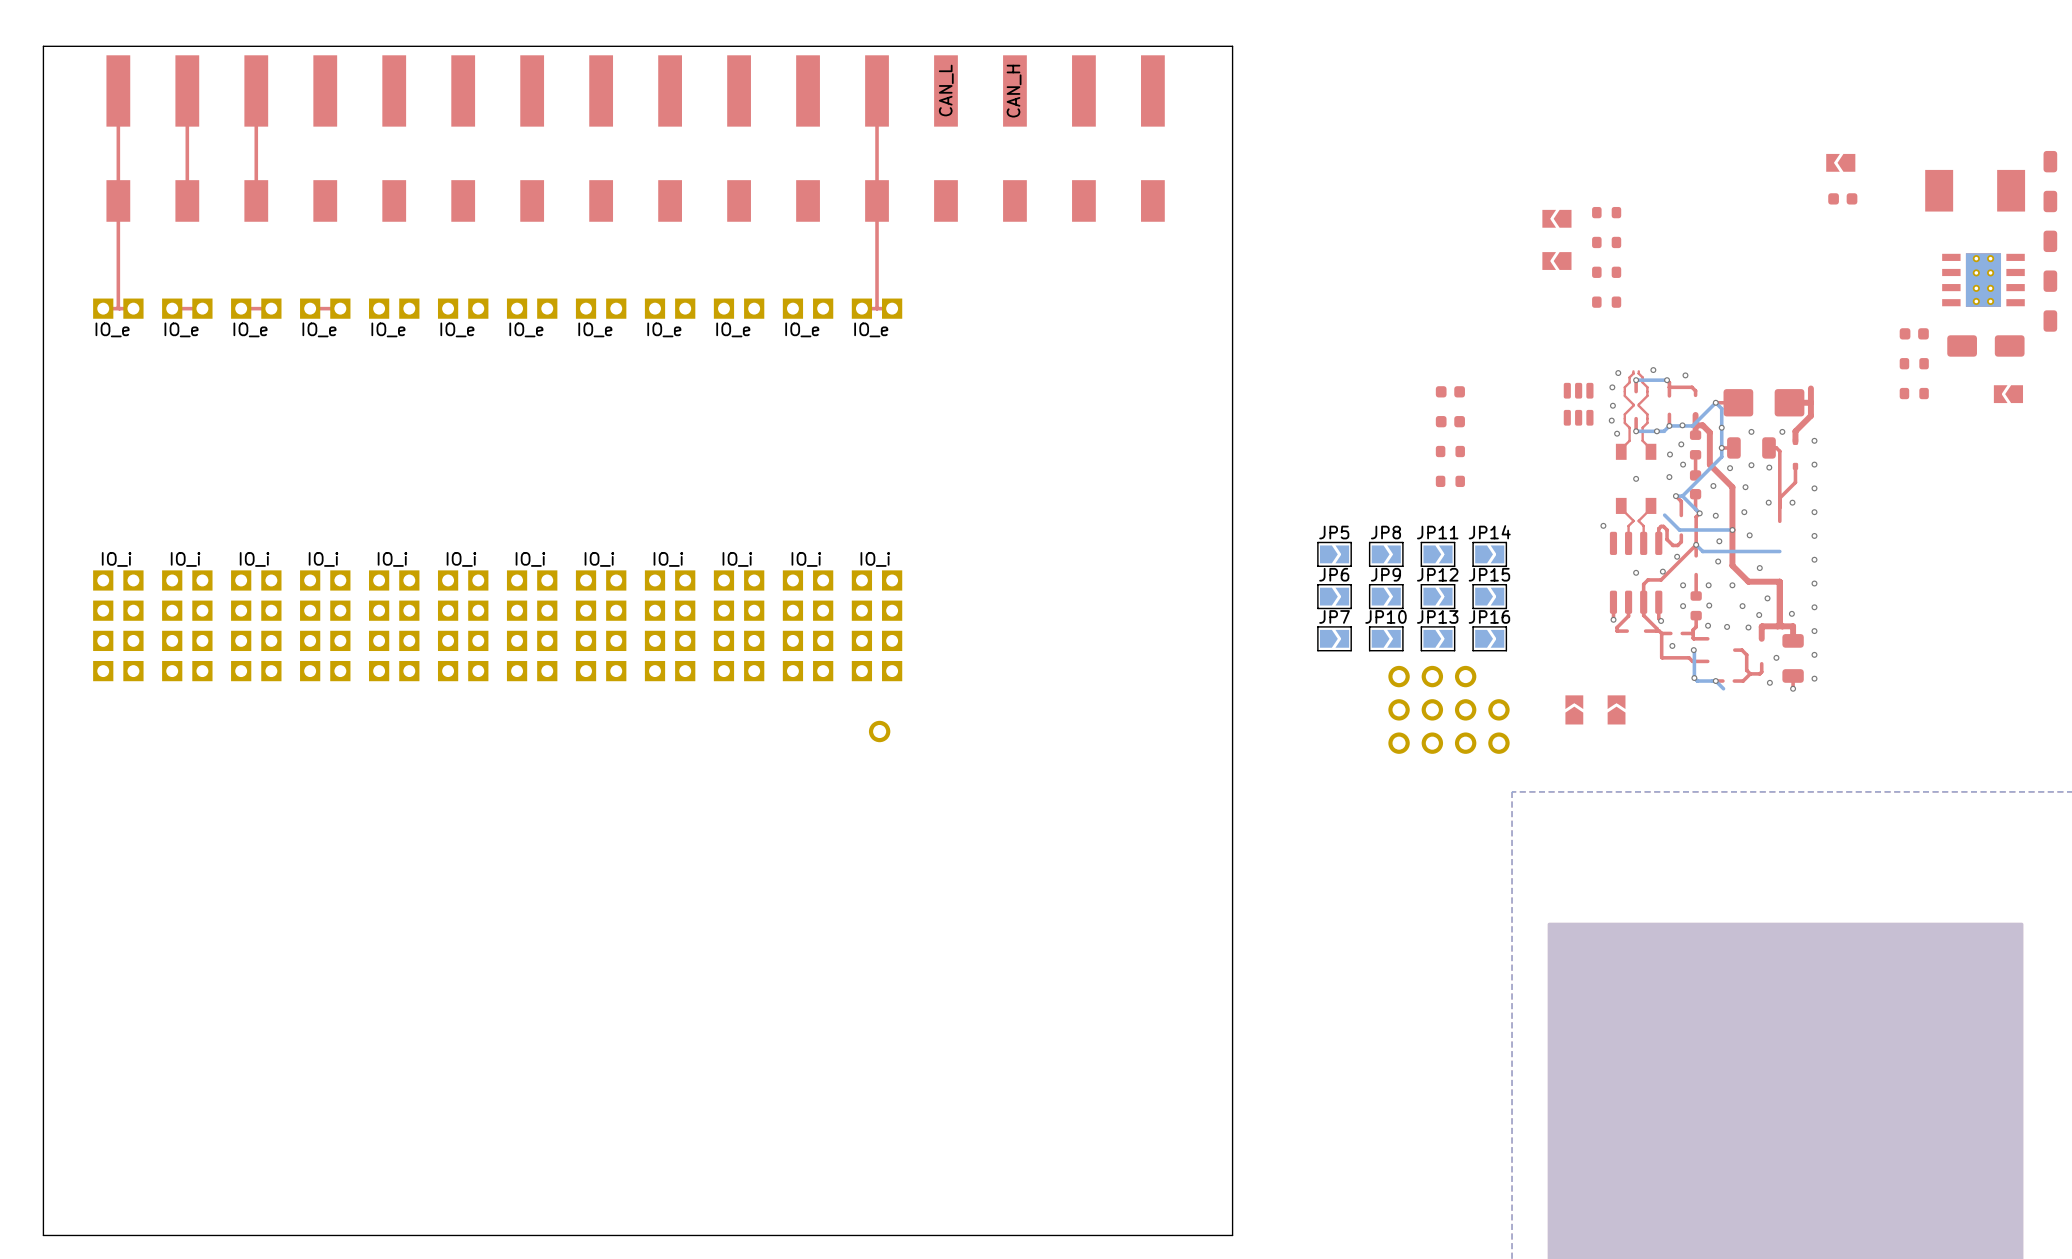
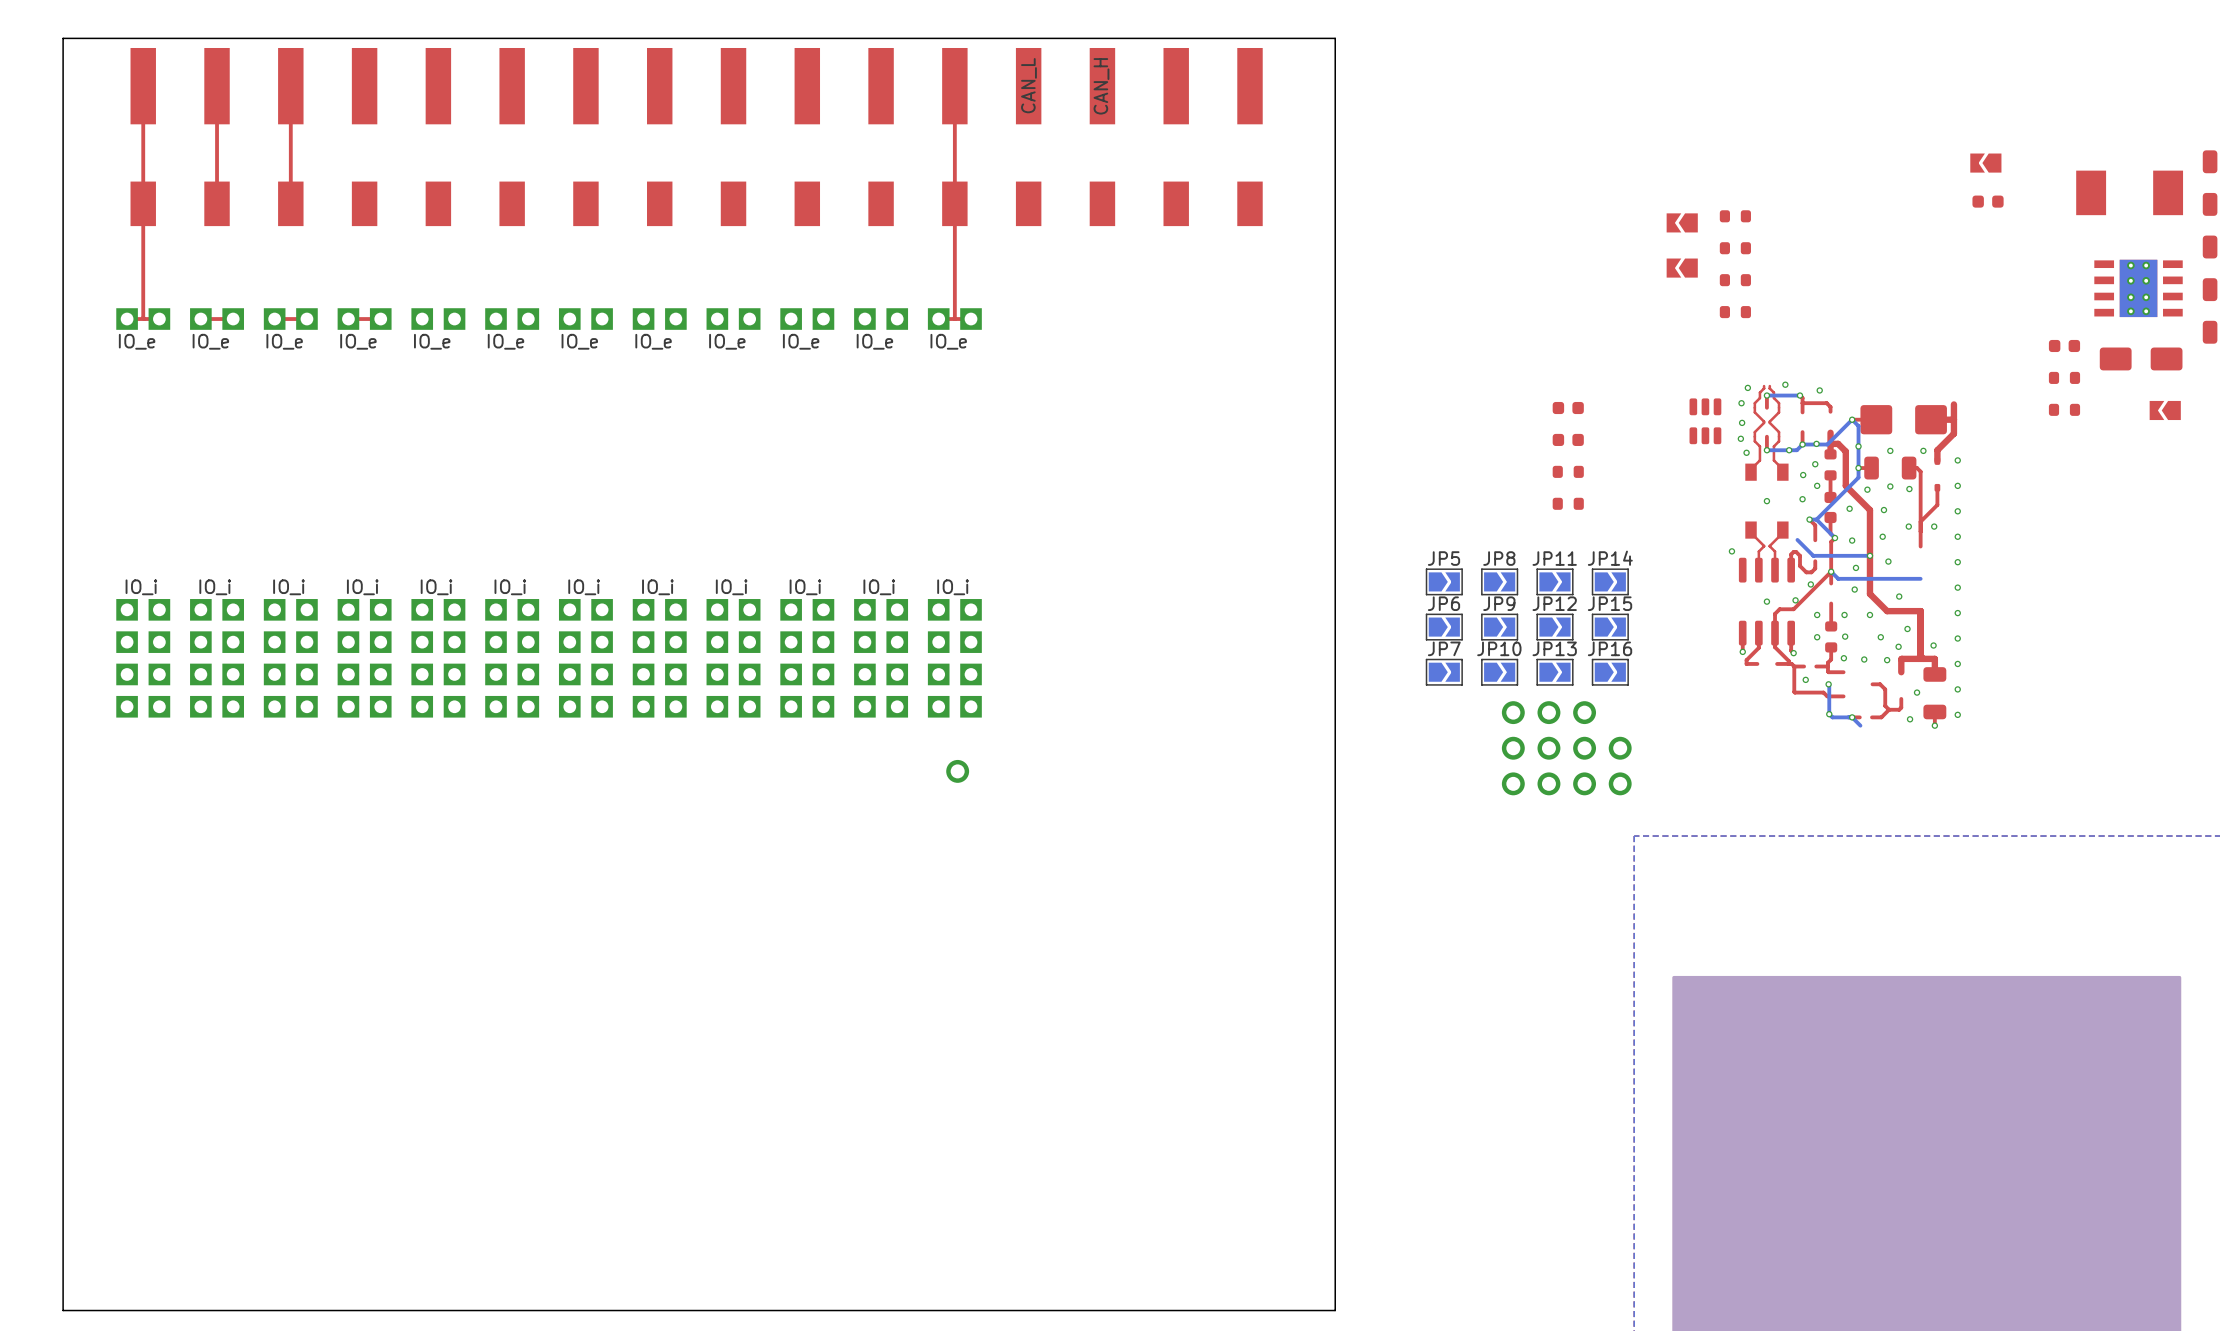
part: (1574, 709) -> none
part: (1616, 709) -> none

